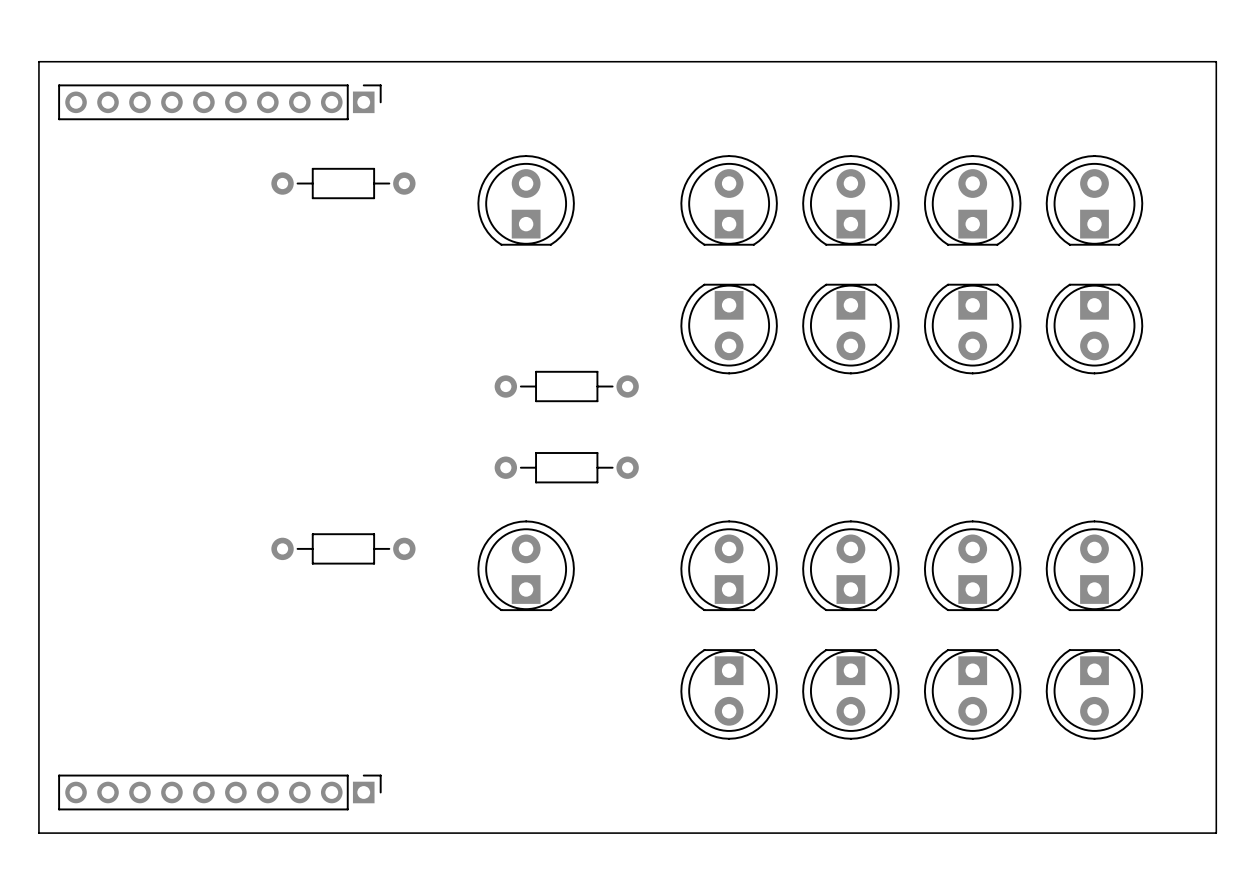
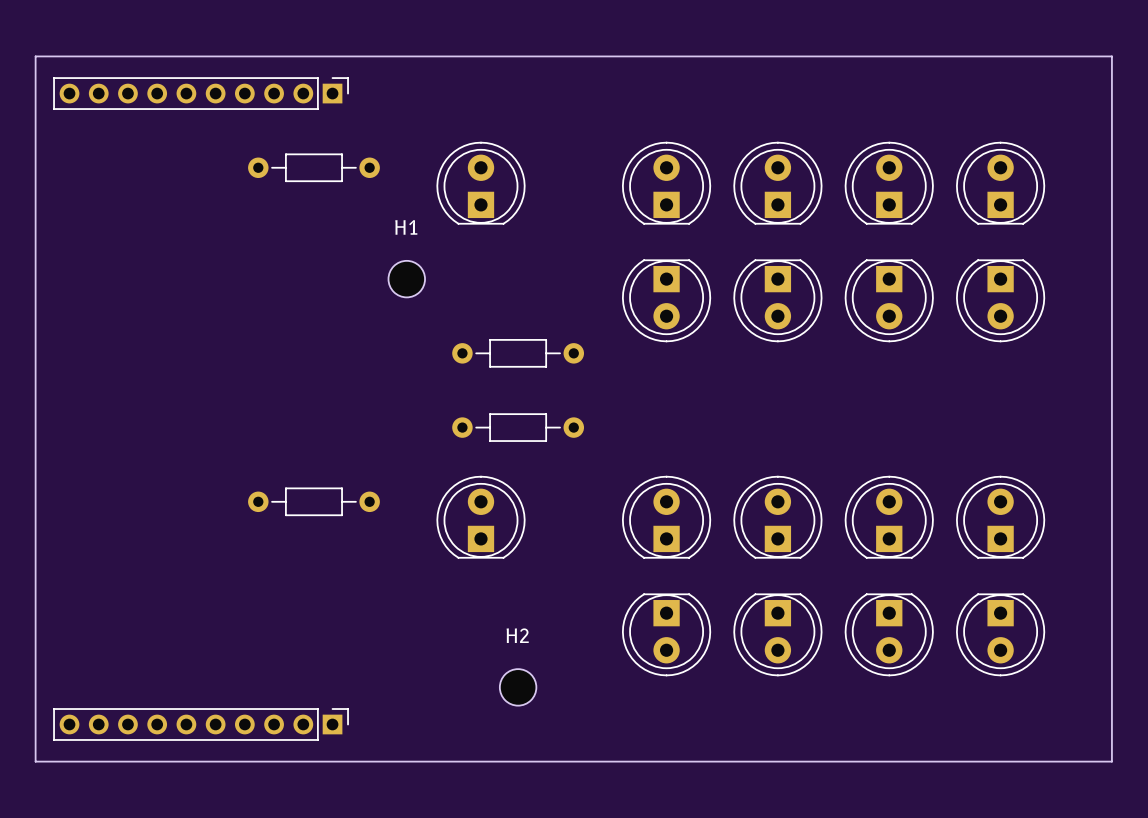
H1: none -> (406, 279)
H2: none -> (518, 687)

